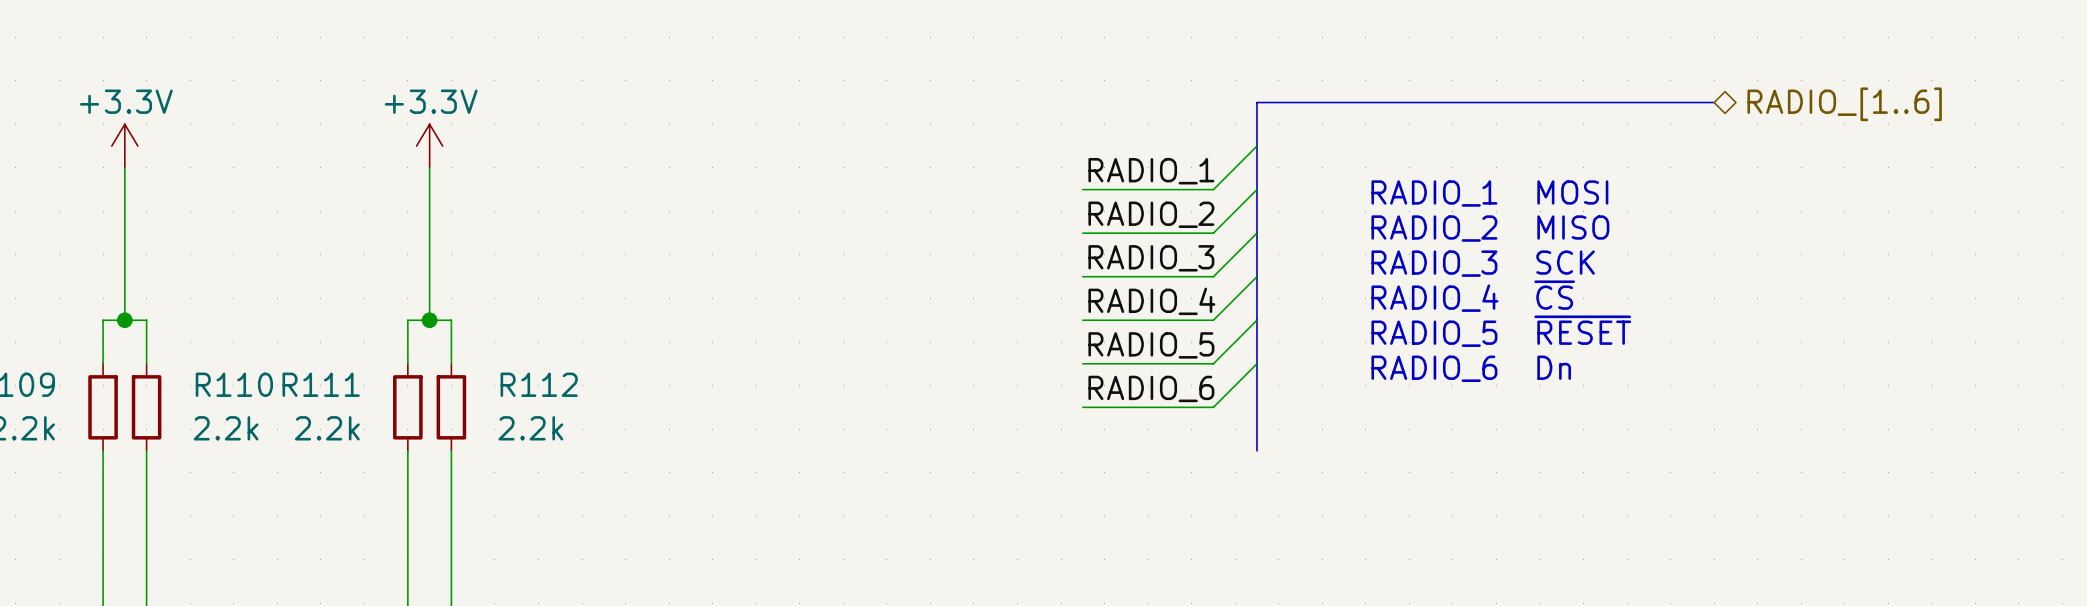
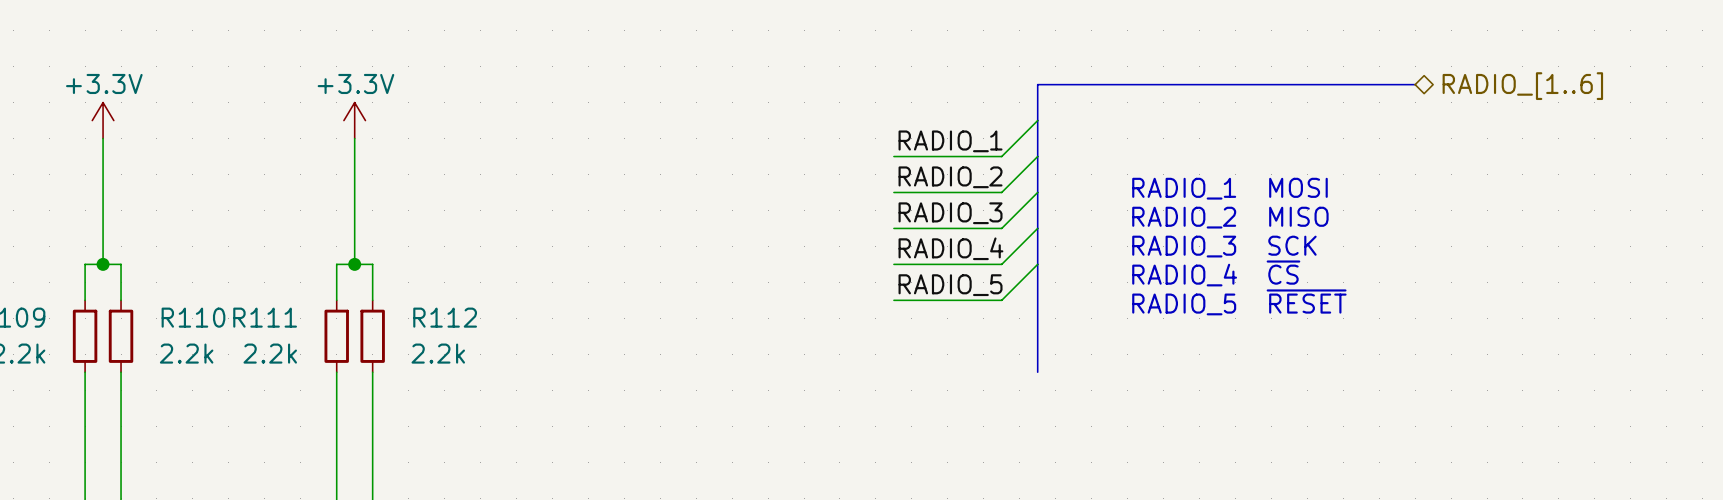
text: RADIO_1 MOSI (1489, 193) -> none
text: RADIO_2 MISO (1490, 228) -> RADIO_1 MOSI (1229, 188)
text: RADIO_3 SCK (1483, 263) -> RADIO_2 MISO (1230, 217)
text: RADIO_4 ~{CS} (1473, 296) -> RADIO_3 SCK (1224, 246)
text: RADIO_5 ~{RESET} (1501, 331) -> RADIO_4 ~{CS} (1216, 273)
wire: (1256, 363) (1213, 407) (1082, 407) -> none
text: RADIO_6 Dn (1471, 368) -> RADIO_5 ~{RESET} (1239, 302)
label: RADIO_6 (1151, 388) -> none

